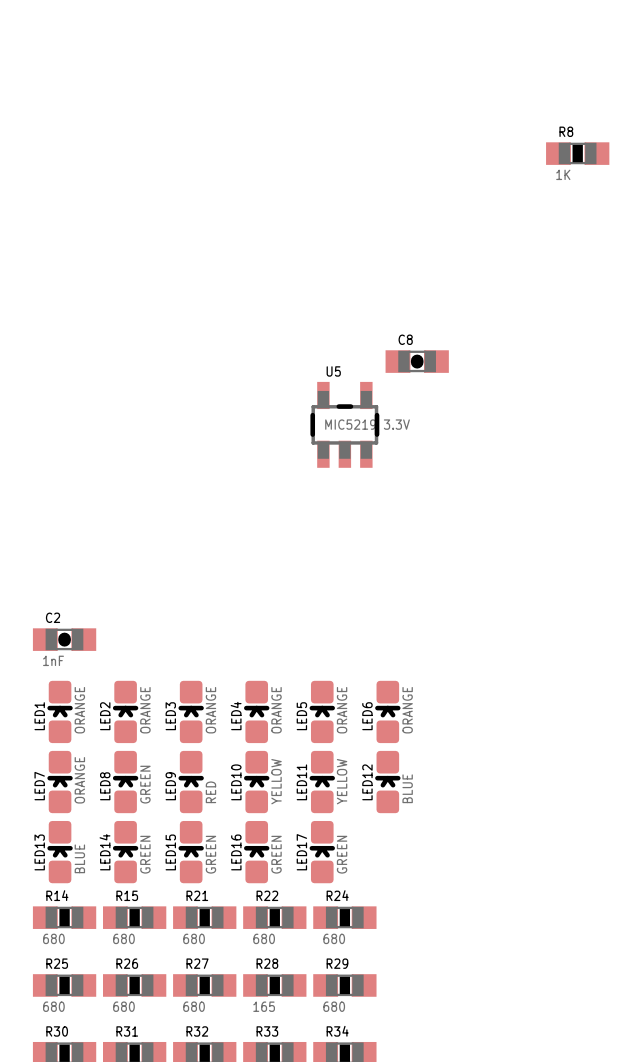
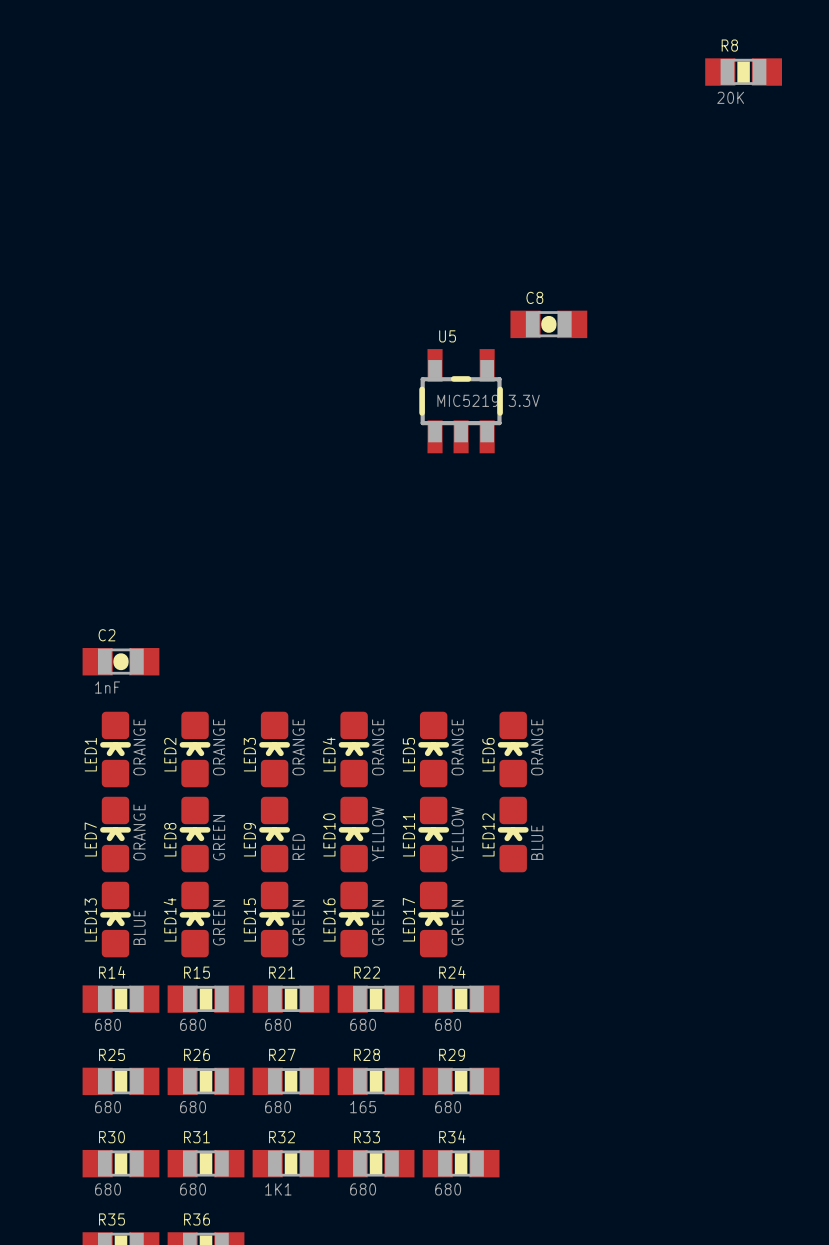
R8 value: 1K (563, 174) -> 20K (730, 97)

